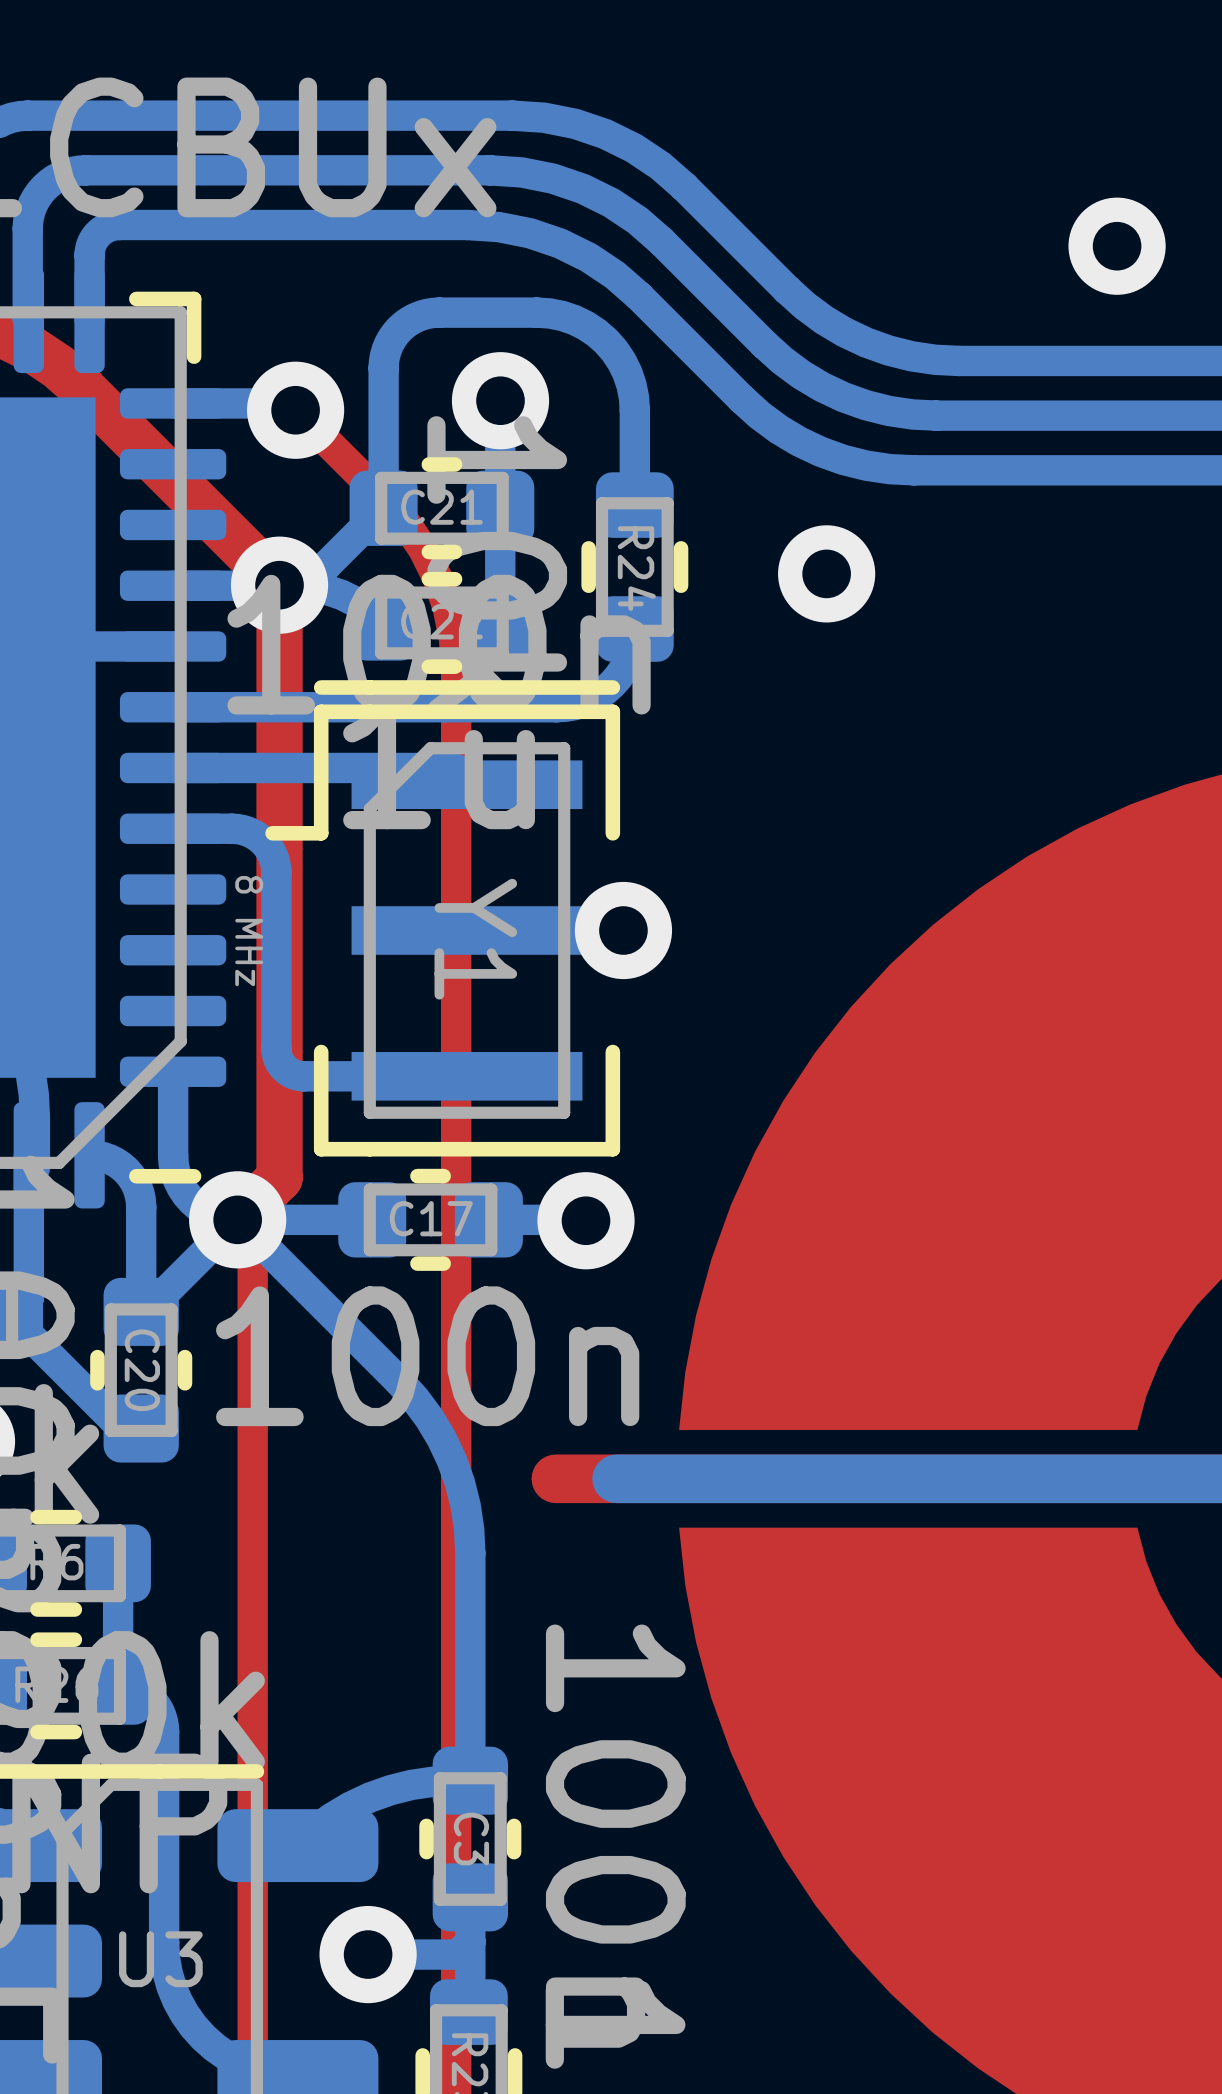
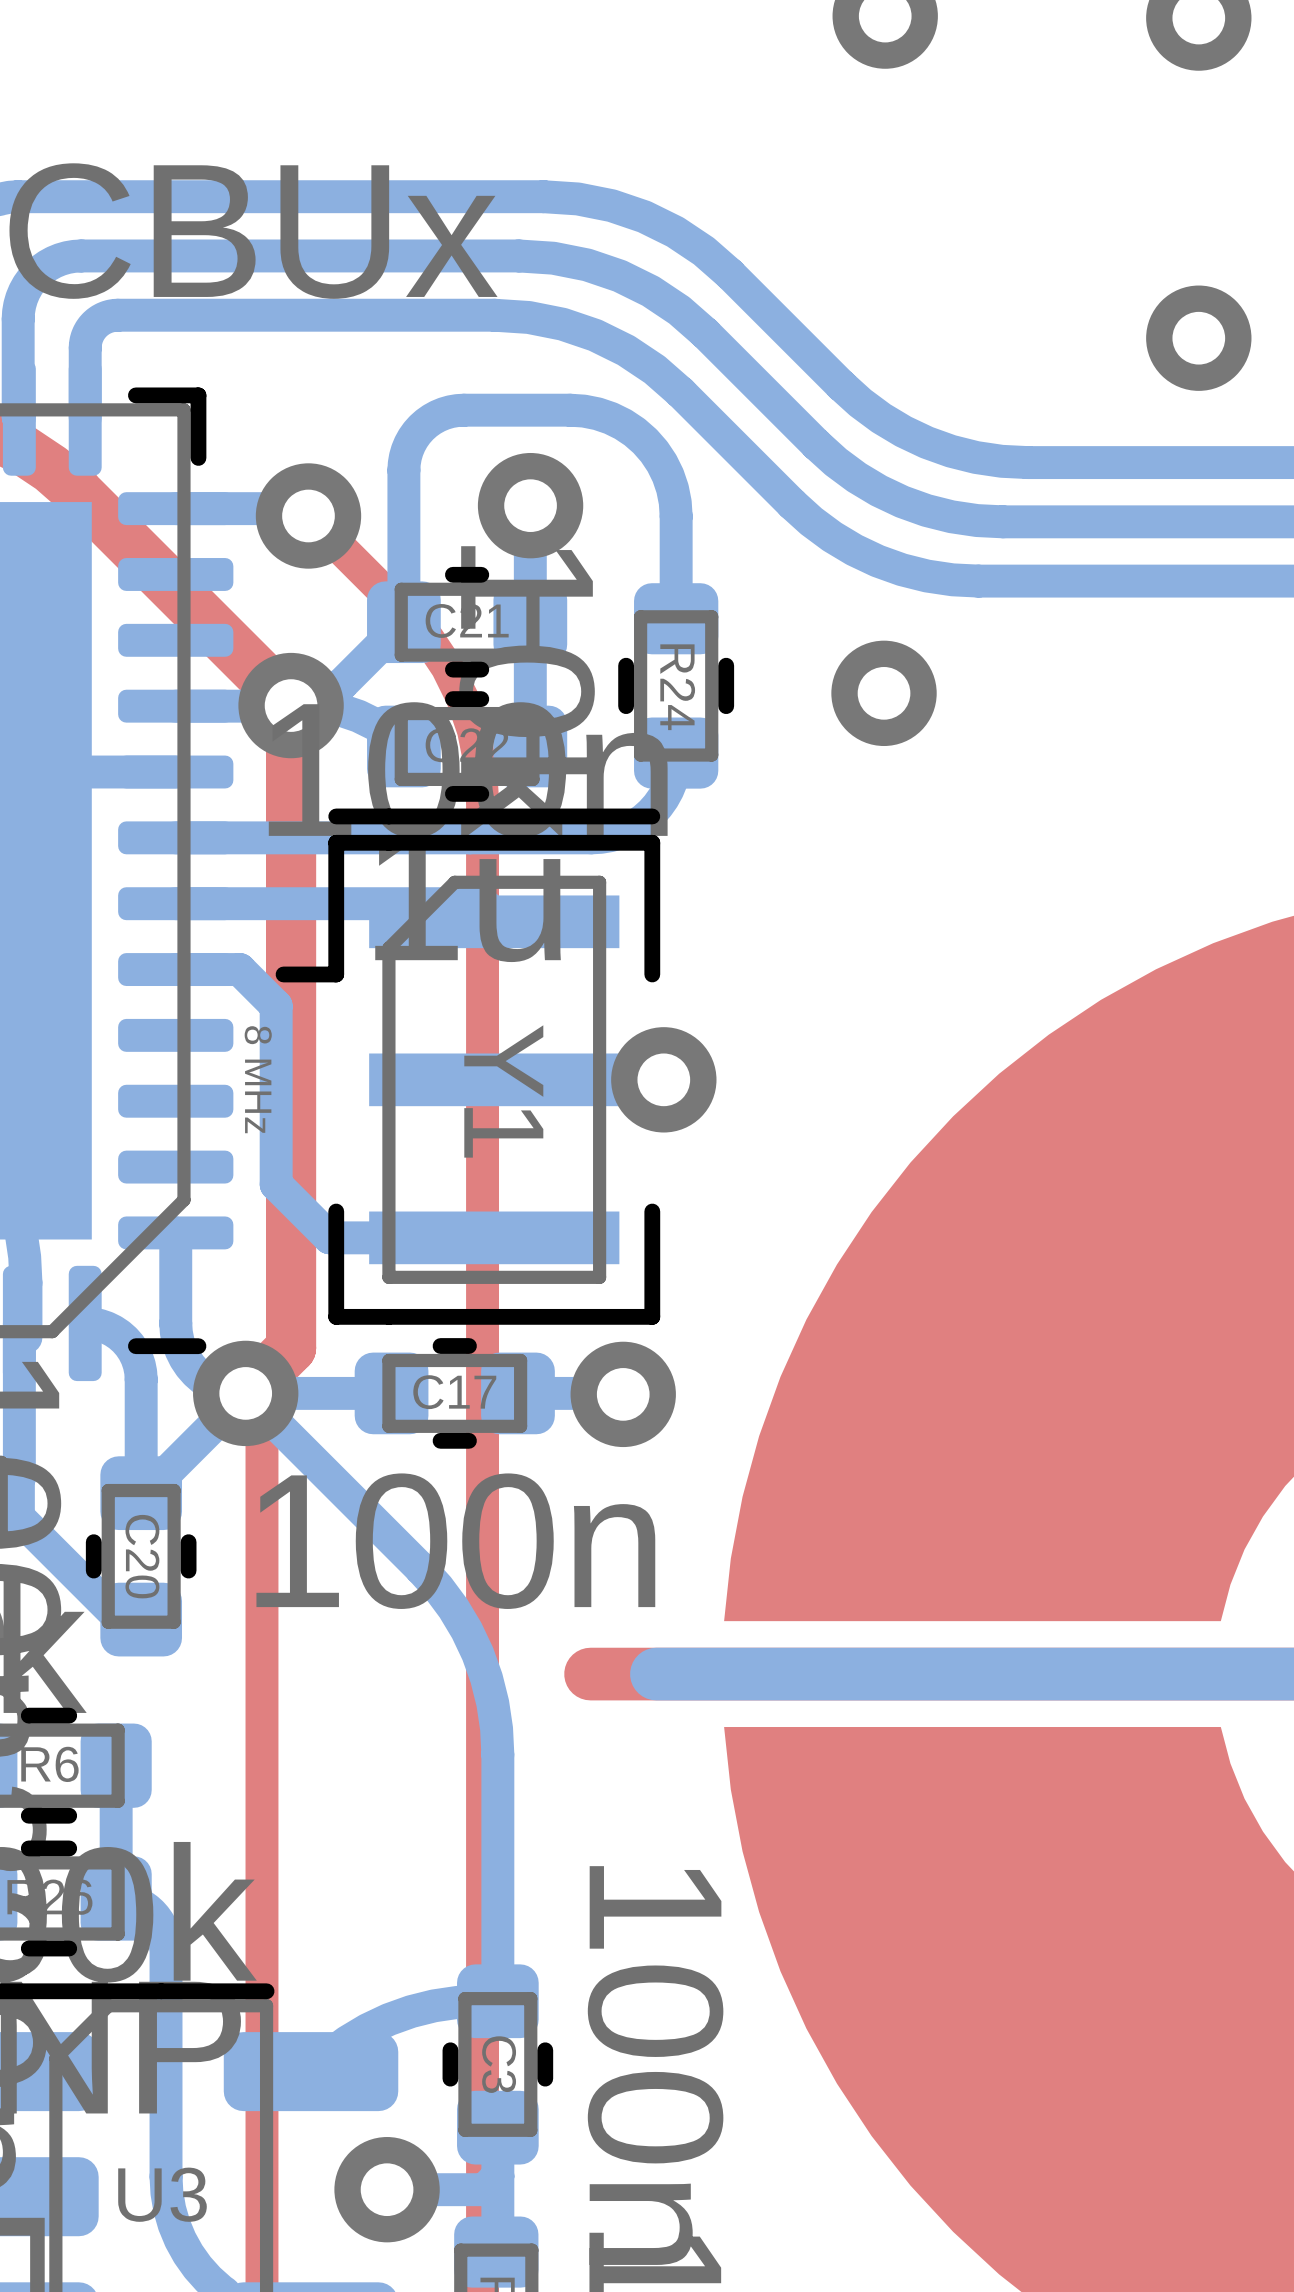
bottom track: (232, 828) (249, 832) (259, 837) (270, 850) (274, 861) (276, 1052) (282, 1065) (290, 1072) (300, 1076) (315, 1076) -> (239, 969) (276, 1006) (276, 1184) (329, 1237)

